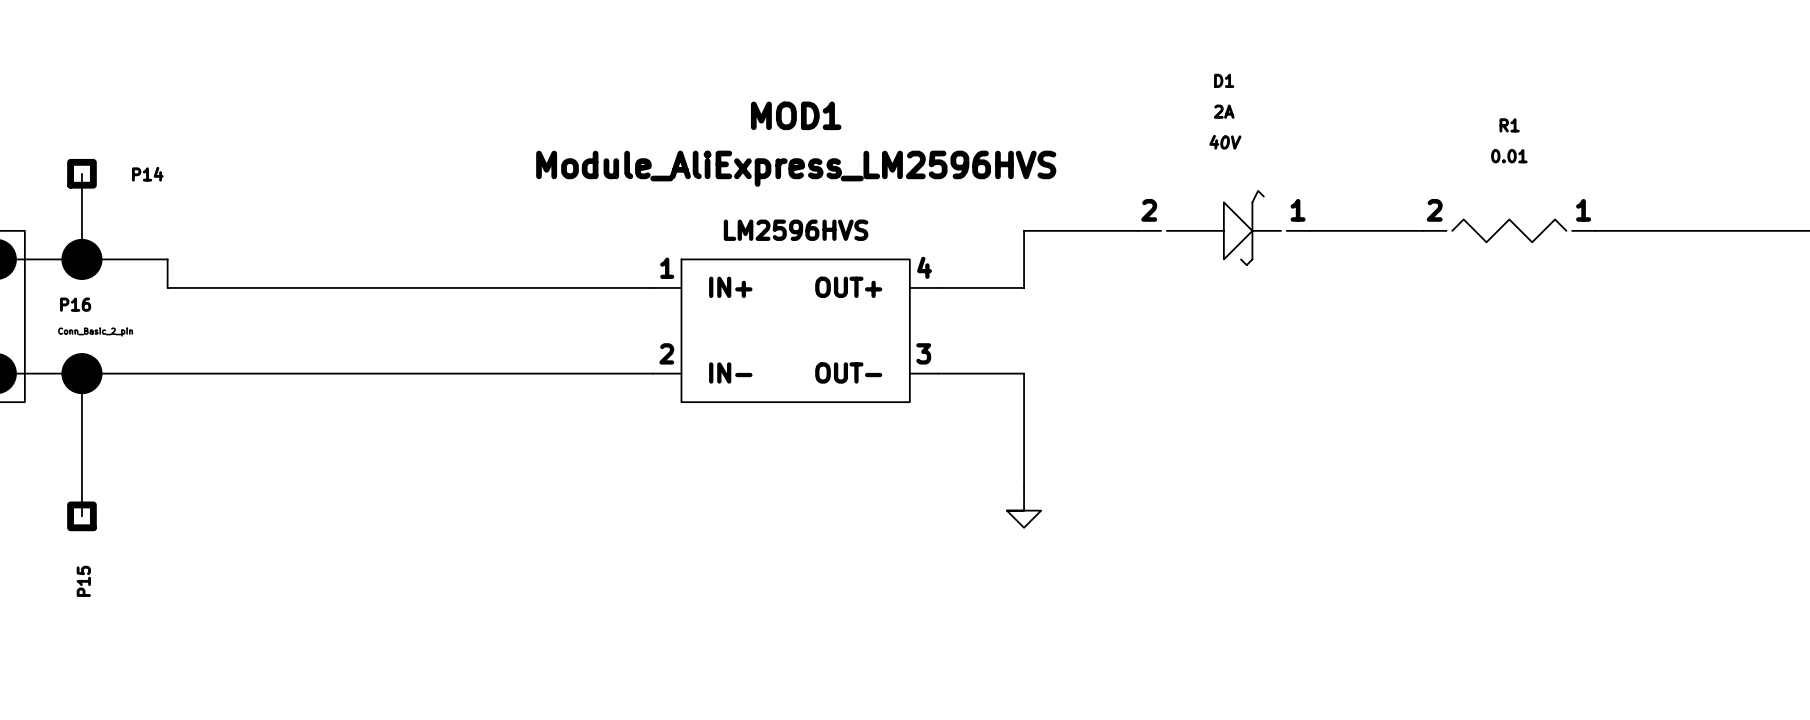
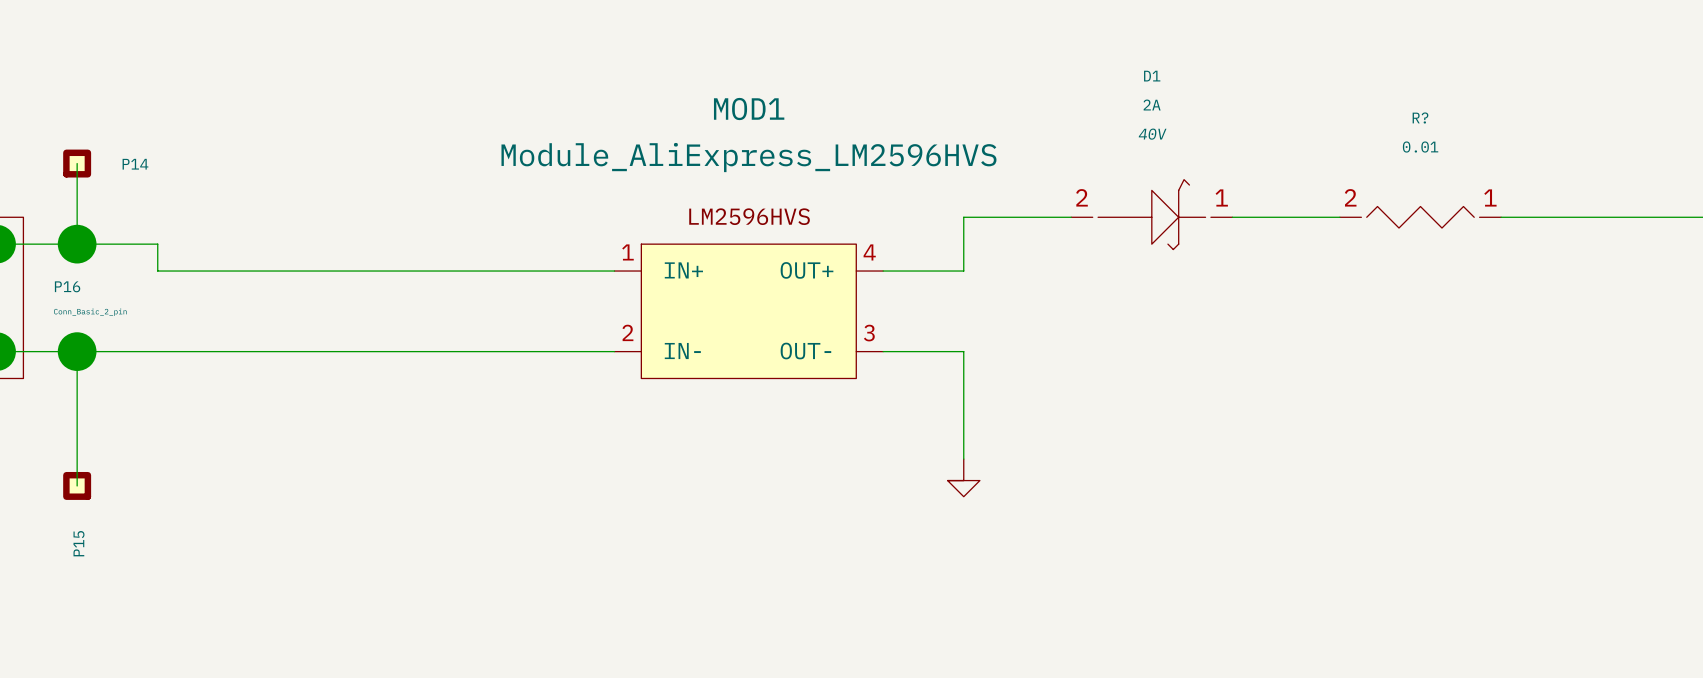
R1 name: R1 (1509, 125) -> R? (1420, 117)

